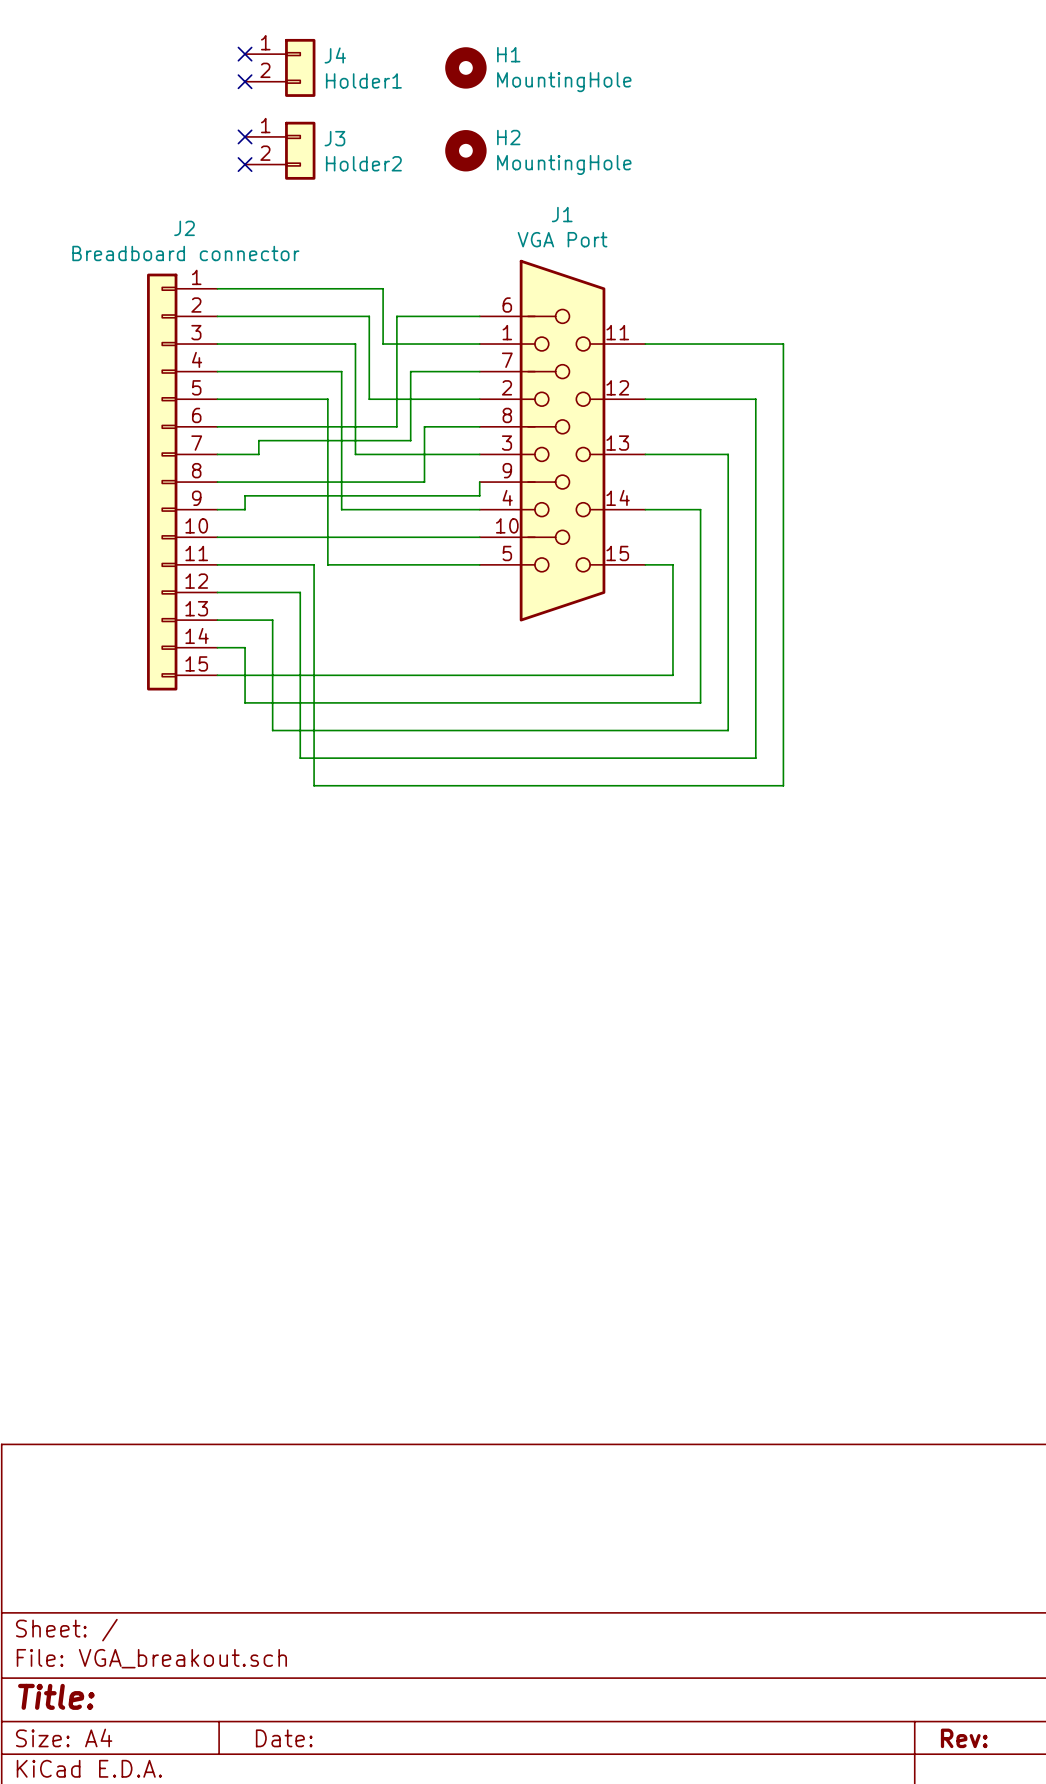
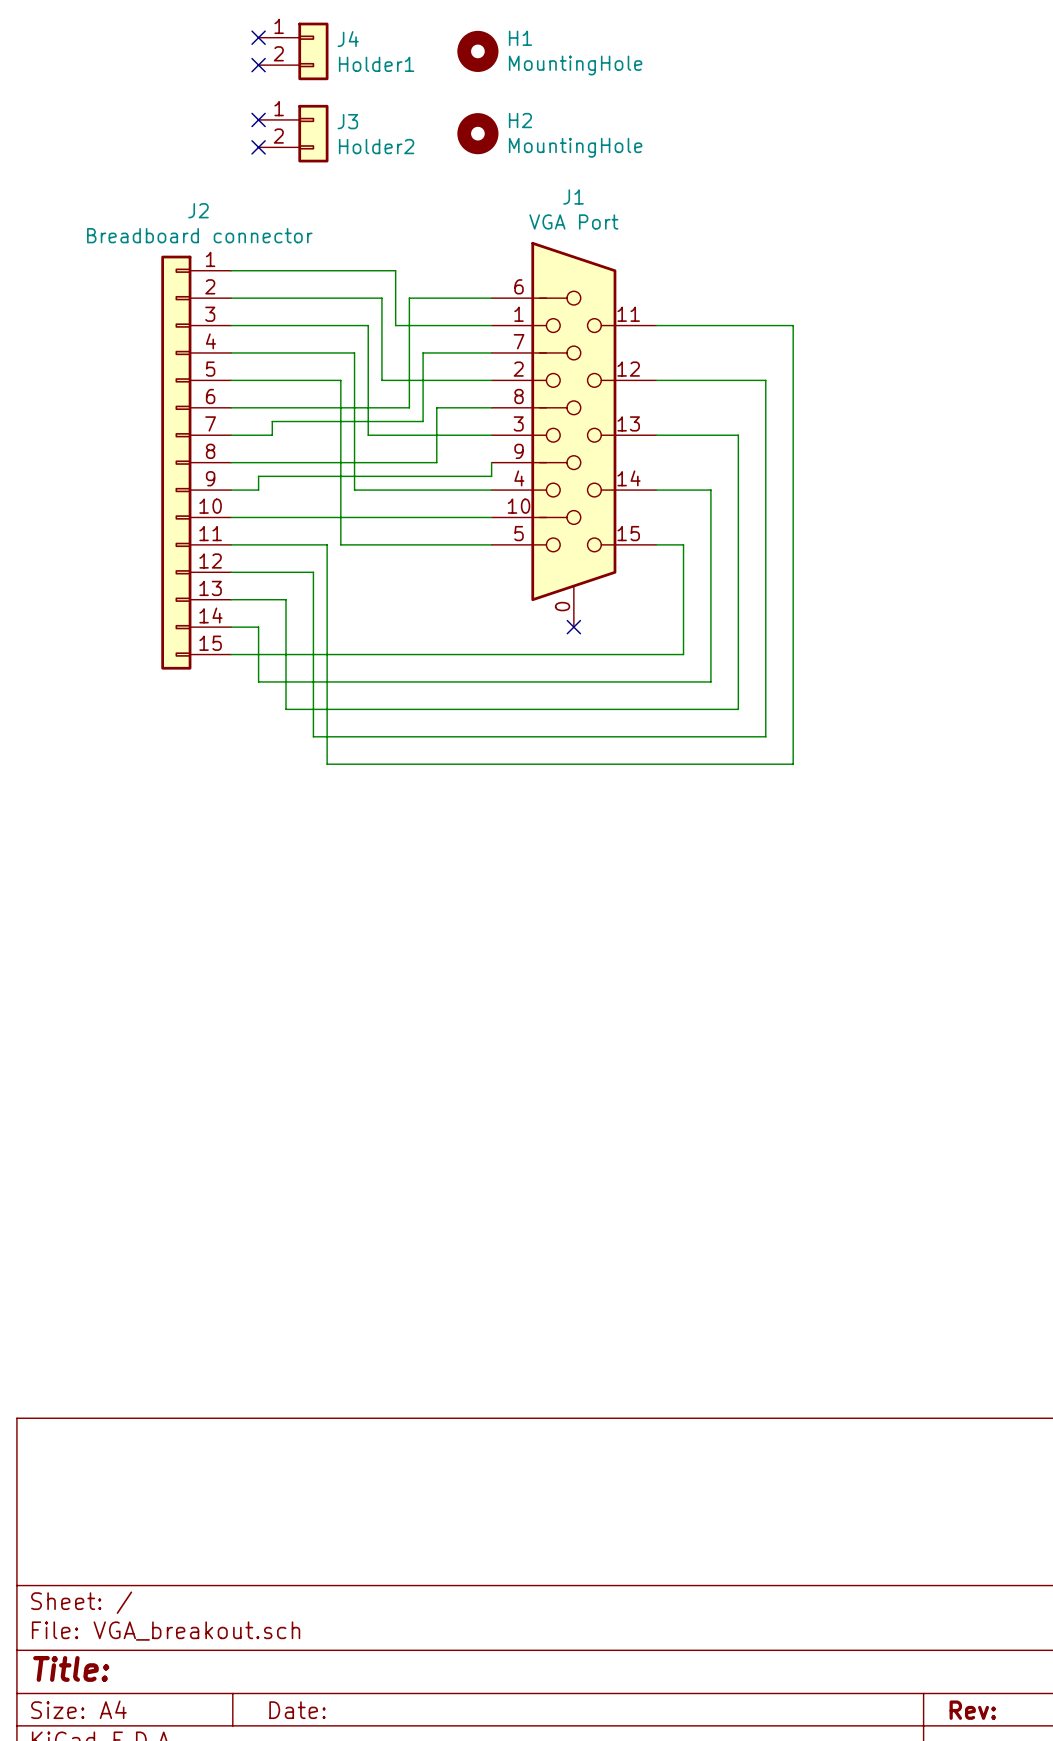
J1 symbol: [479, 259, 646, 622] -> [491, 241, 657, 628]
no-connect mark: none -> (573, 627)

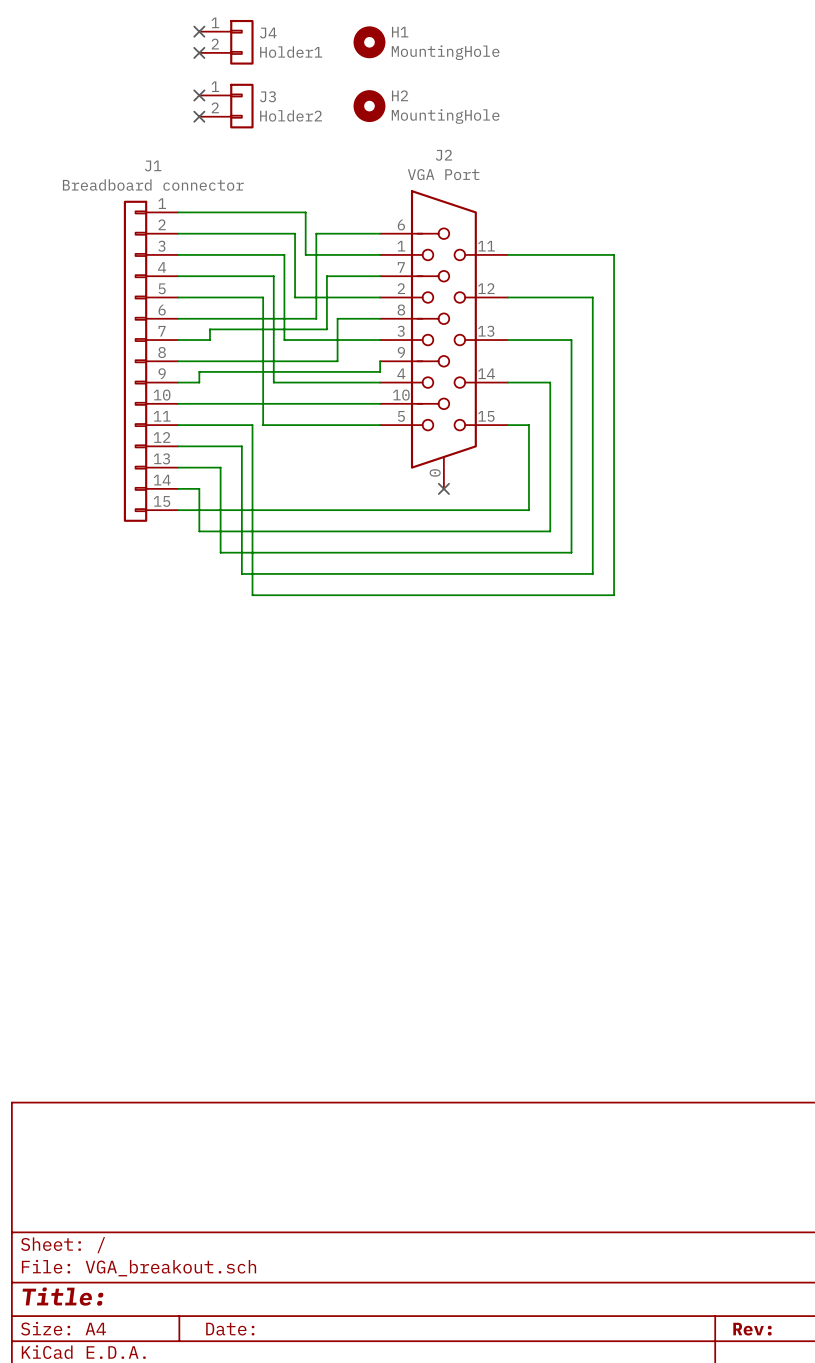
J1 name: J1 (573, 197) -> J2 (443, 155)
J2 name: J2 (198, 210) -> J1 (153, 165)

